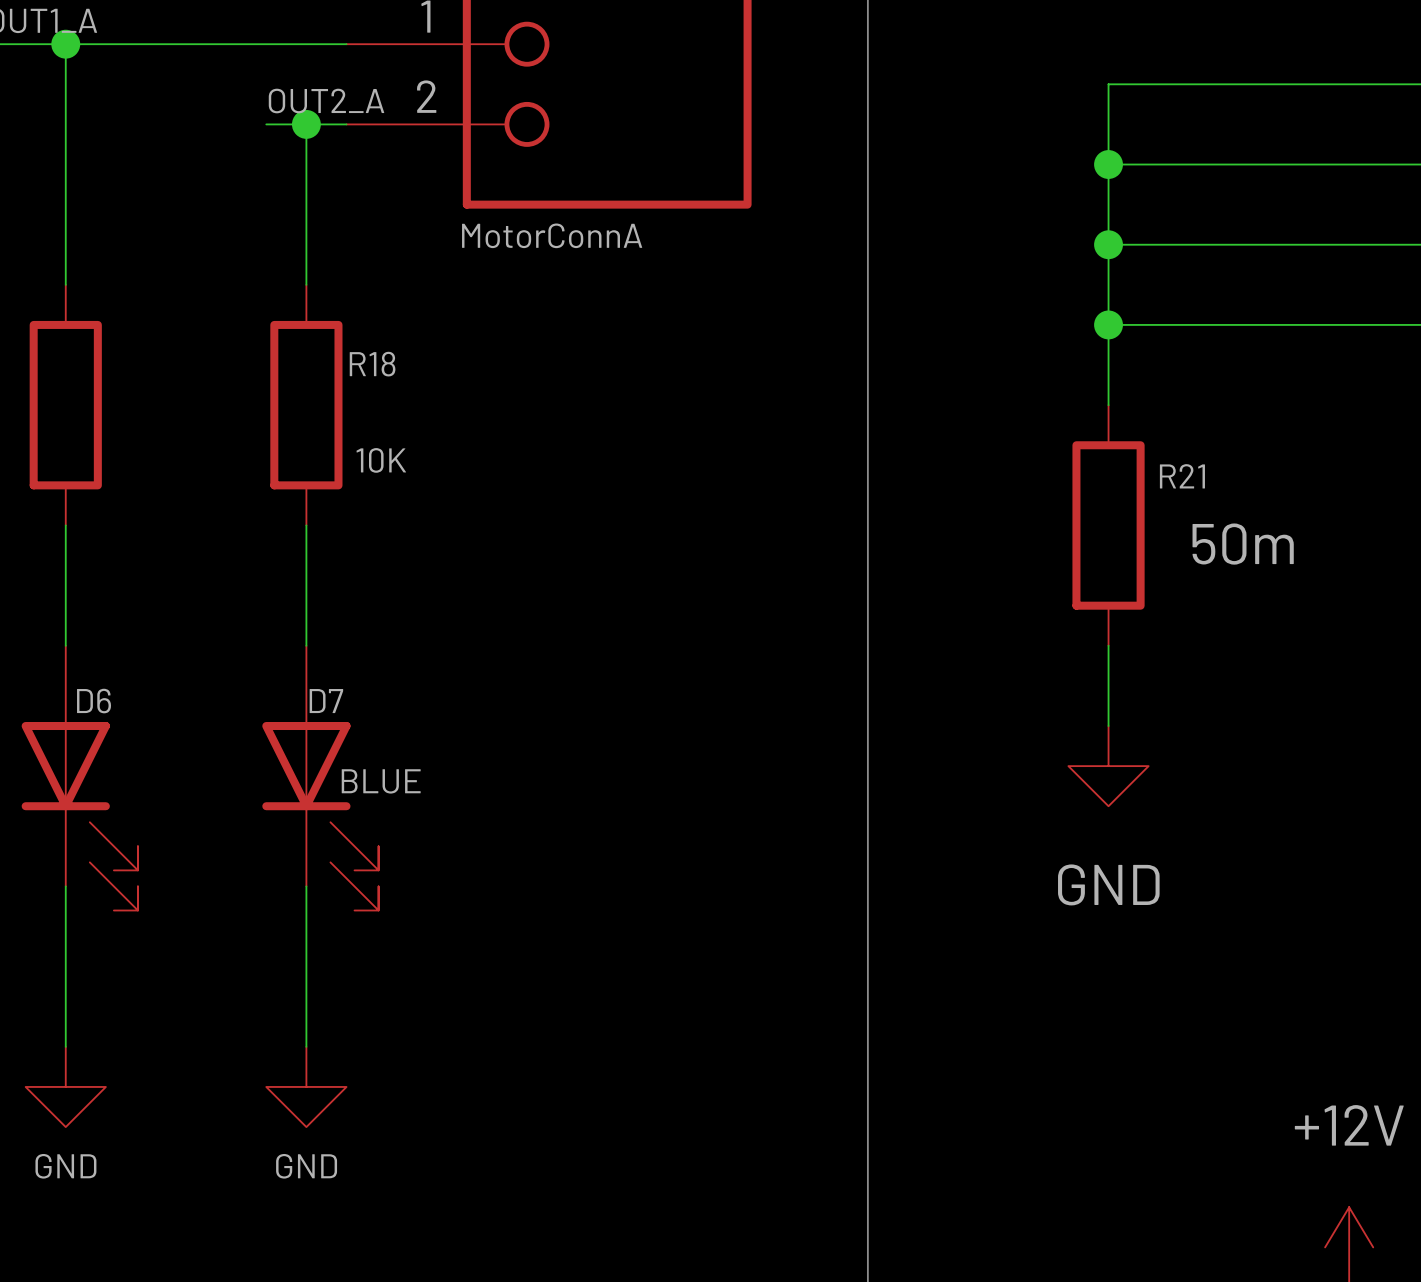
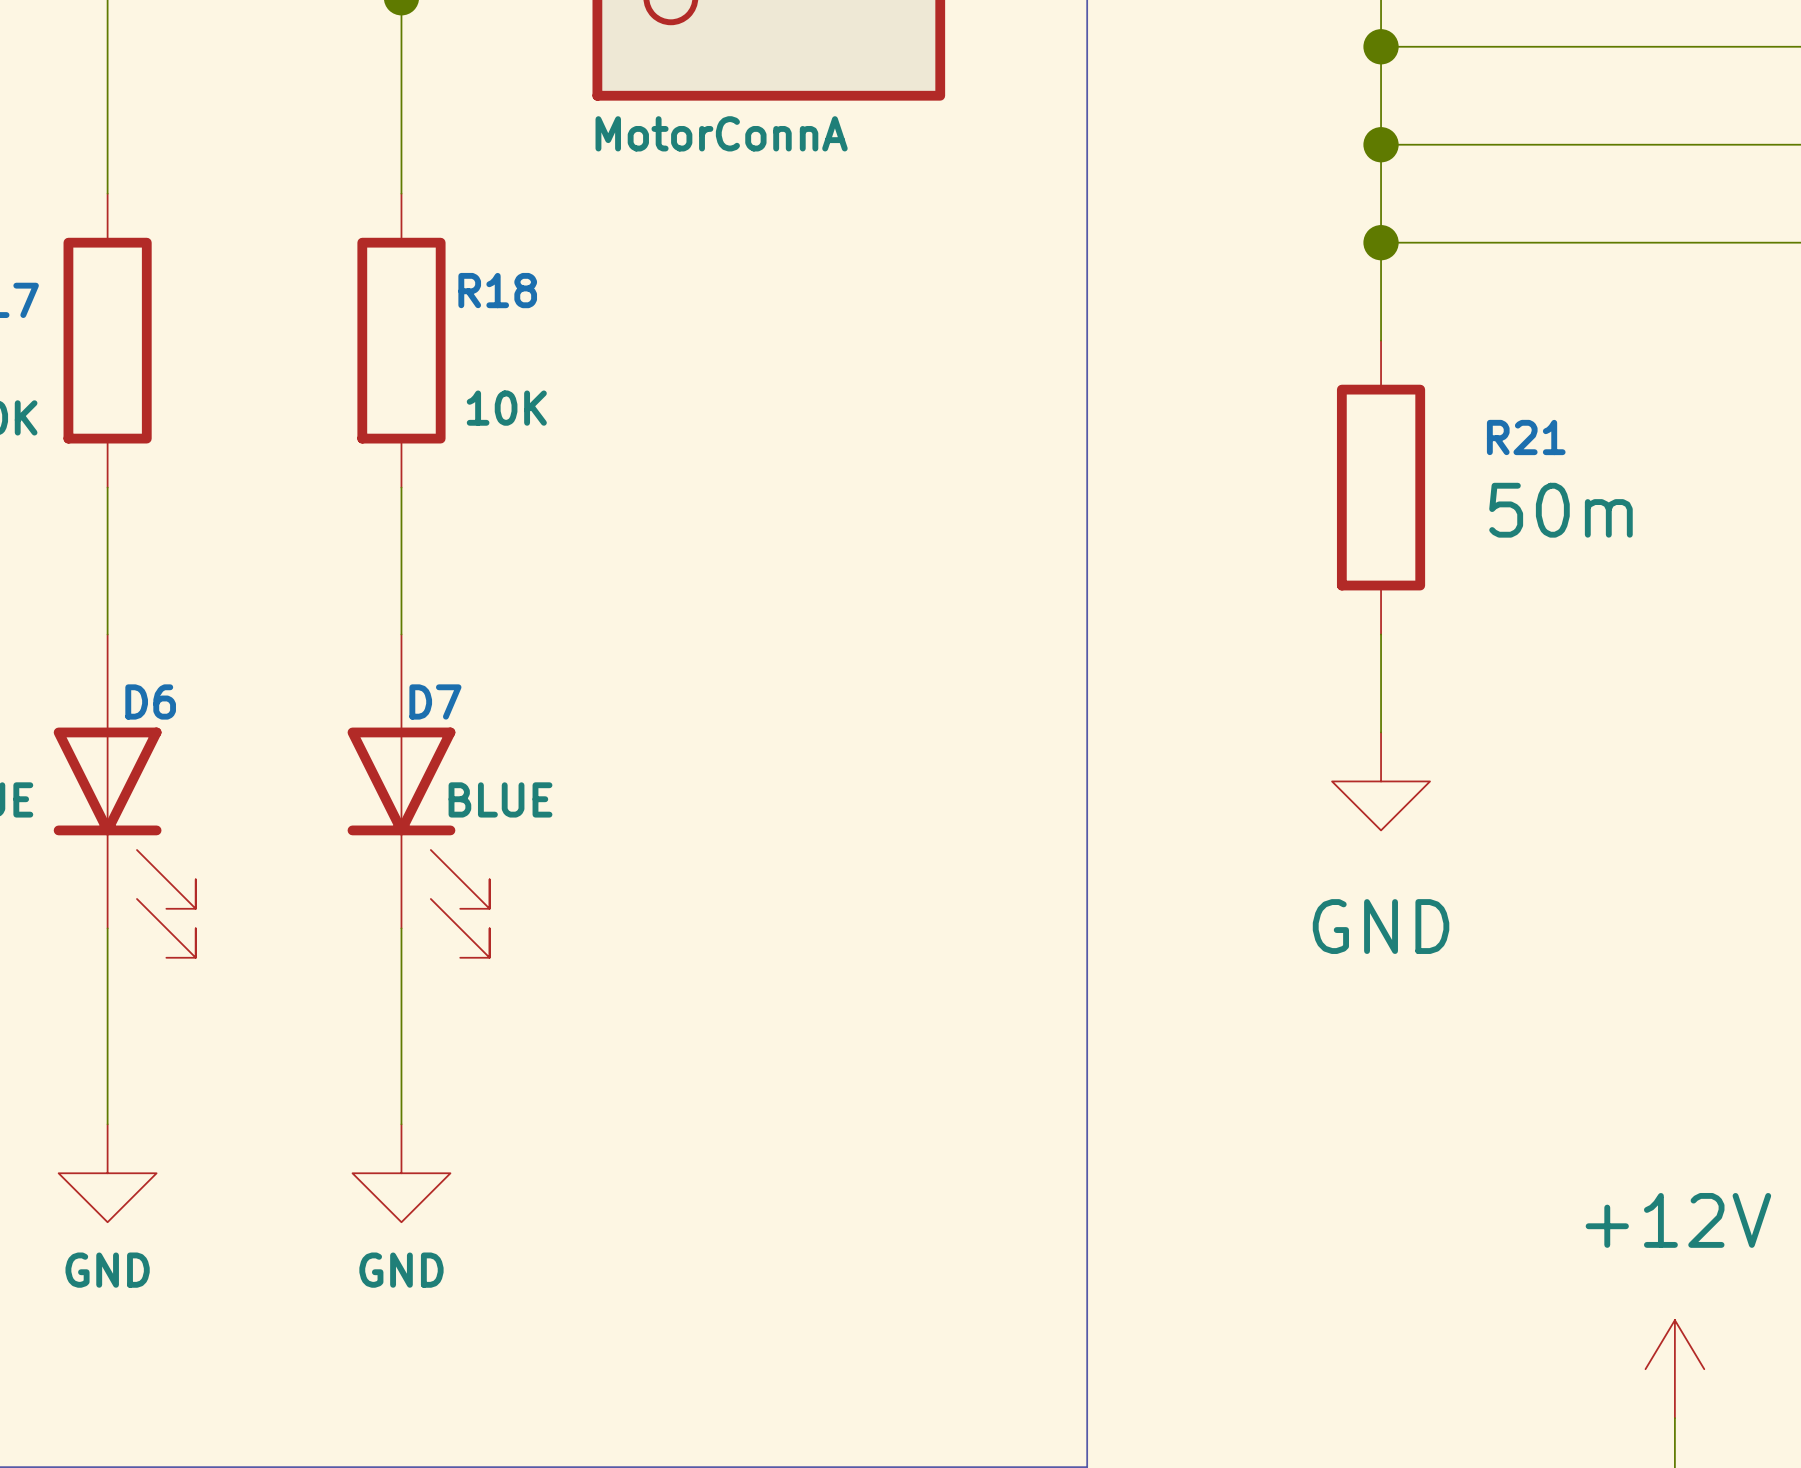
R21 name position: R21 (1182, 476) -> R21 (1526, 437)

